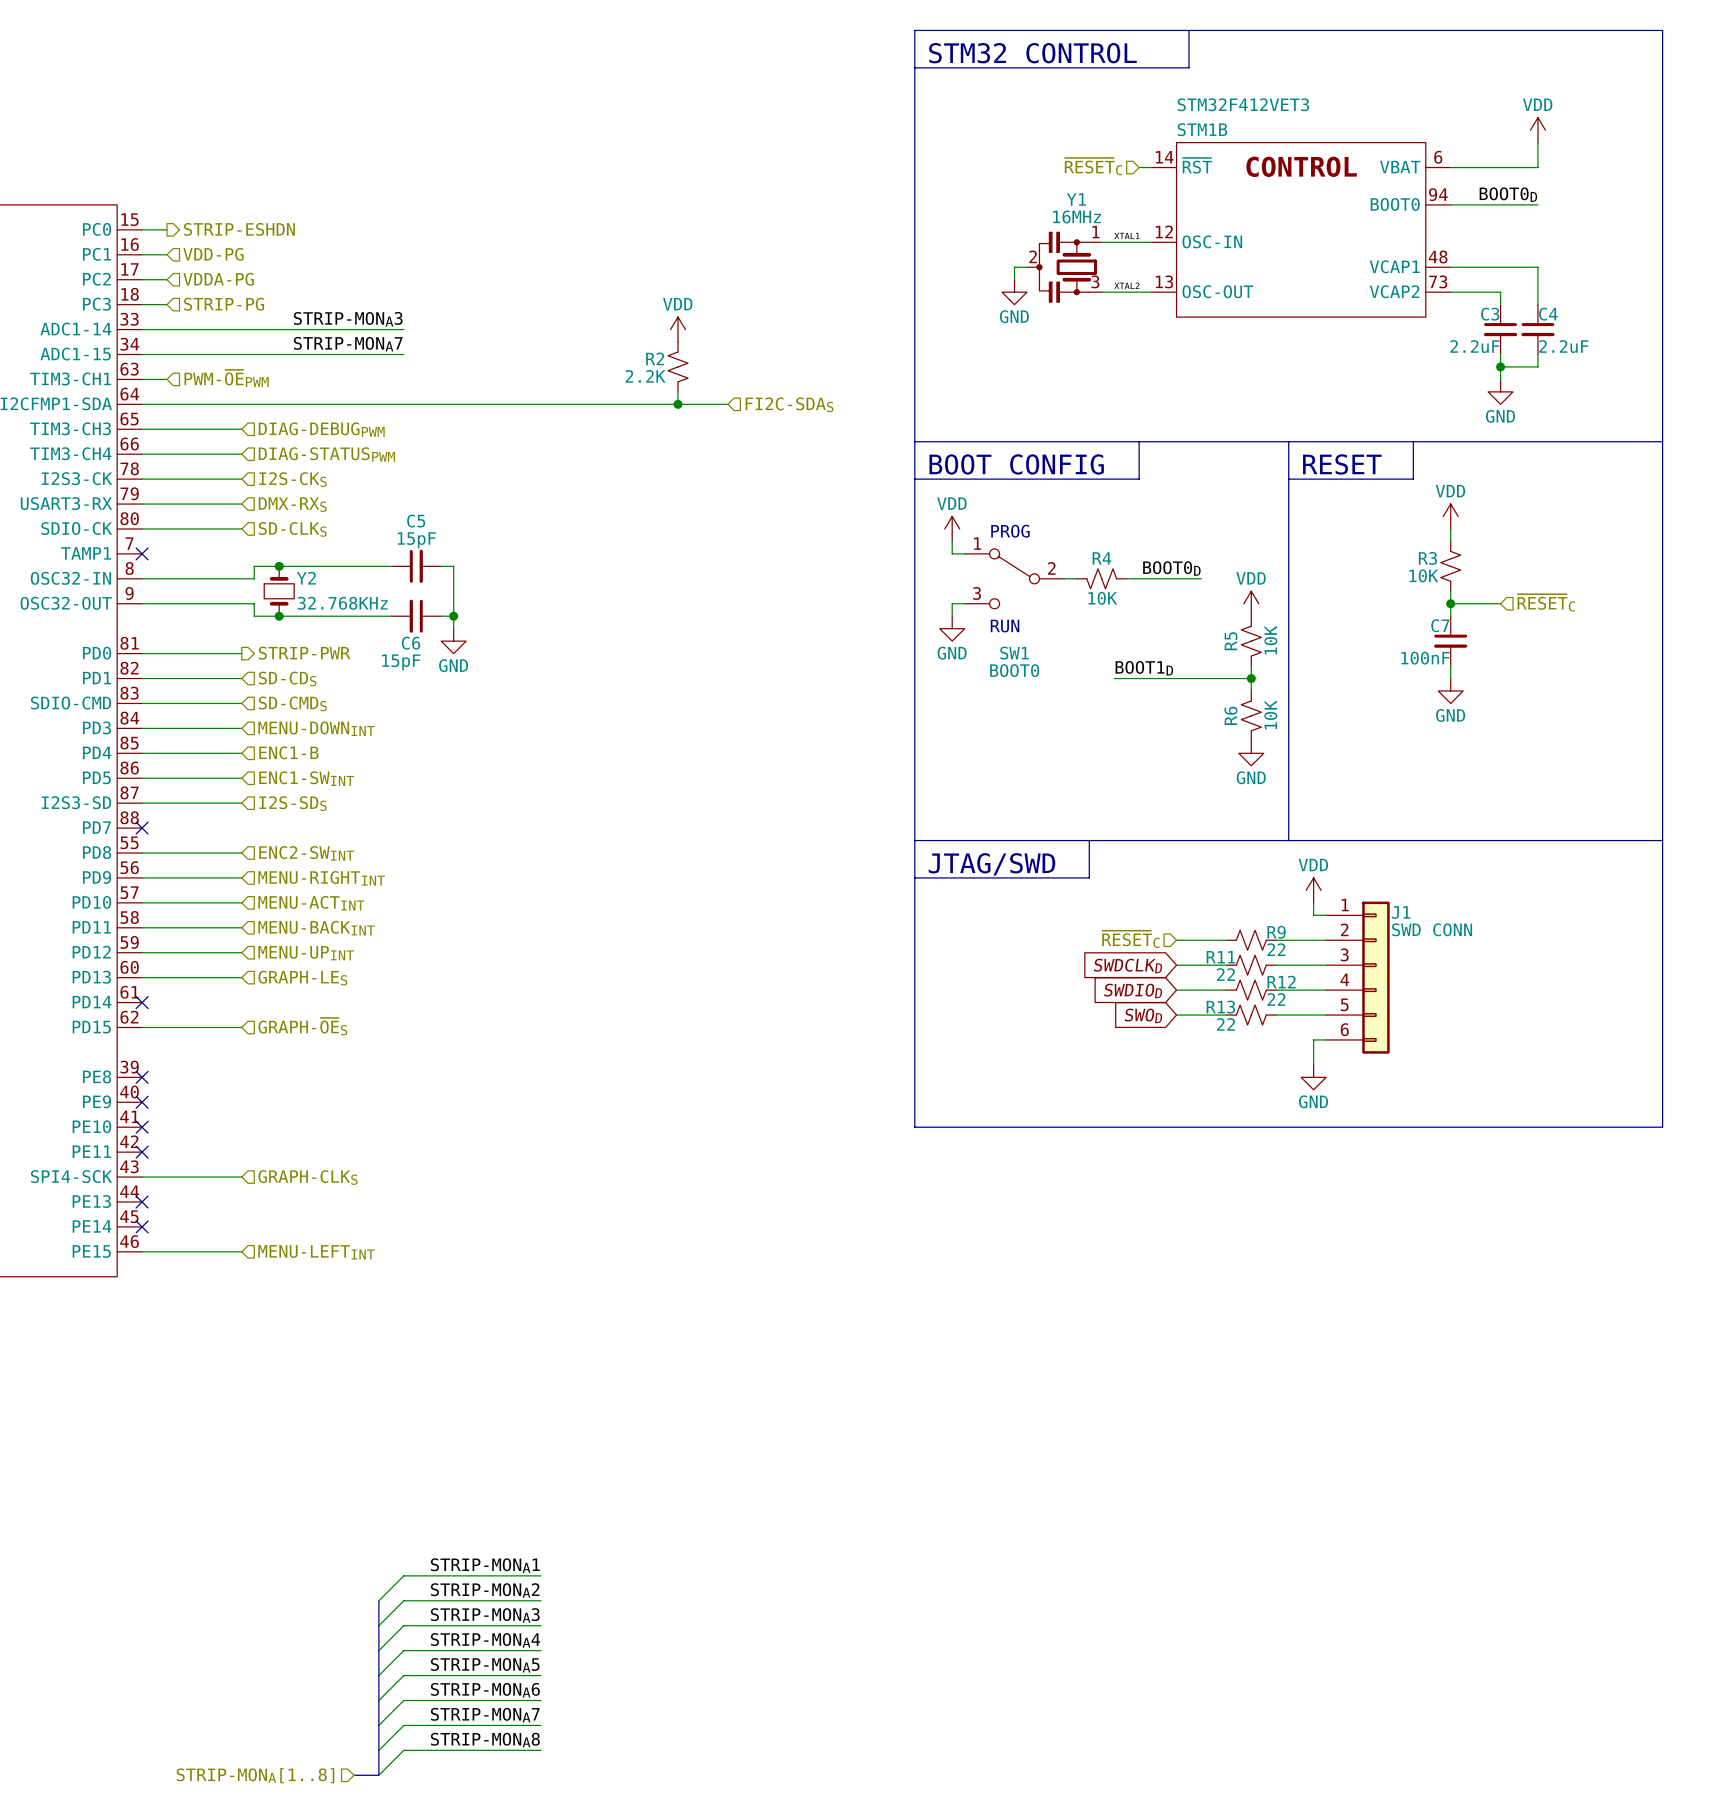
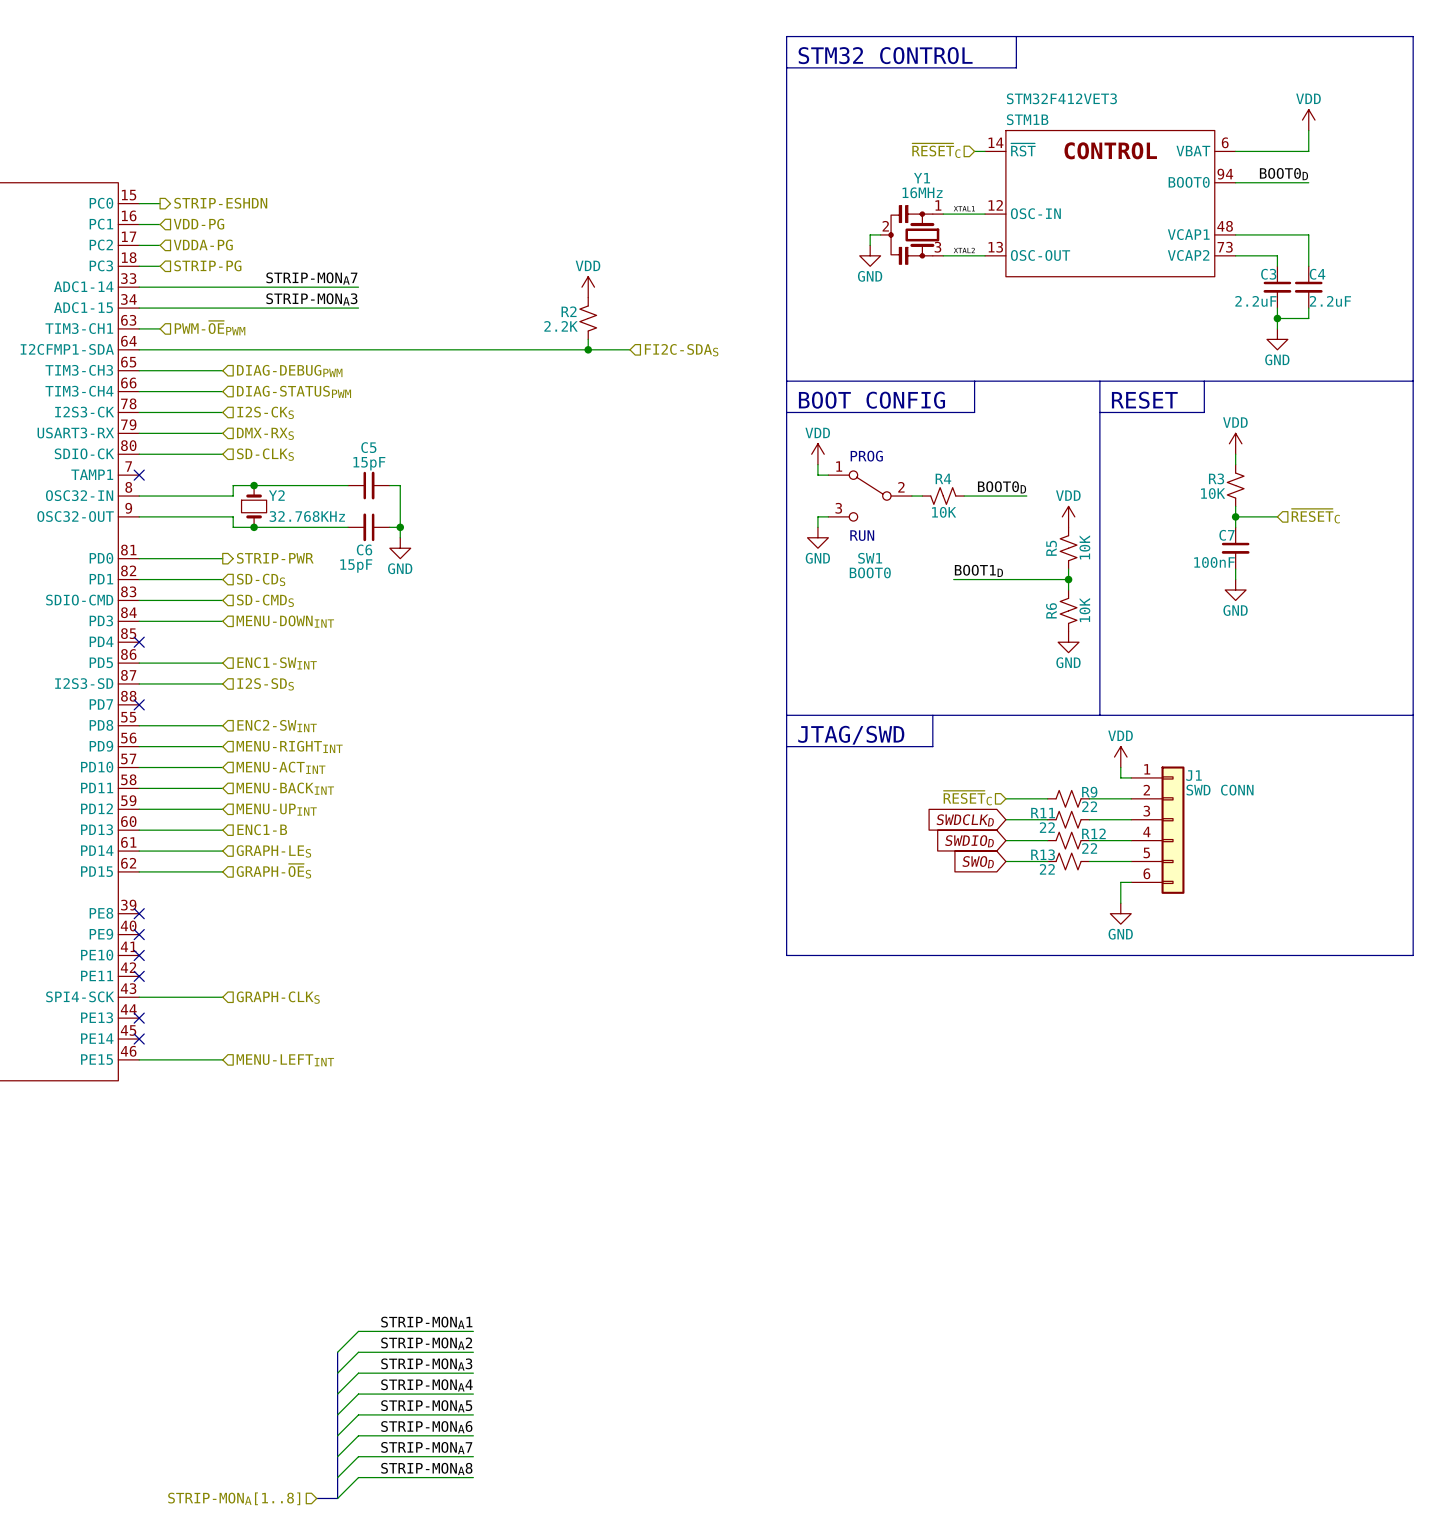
label: STRIP-MONA3 (348, 319) -> STRIP-MONA7 (311, 278)
label: STRIP-MONA7 (348, 344) -> STRIP-MONA3 (311, 299)
hierarchical label: ENC1-B (288, 752) -> none
wire: (142, 753) (241, 753) -> none
no-connect mark: none -> (139, 642)
hierarchical label: GRAPH-LES (302, 978) -> ENC1-B (262, 829)
wire: none -> (139, 851) (222, 851)
no-connect mark: (142, 1002) -> none
hierarchical label: none -> GRAPH-LES (273, 851)

